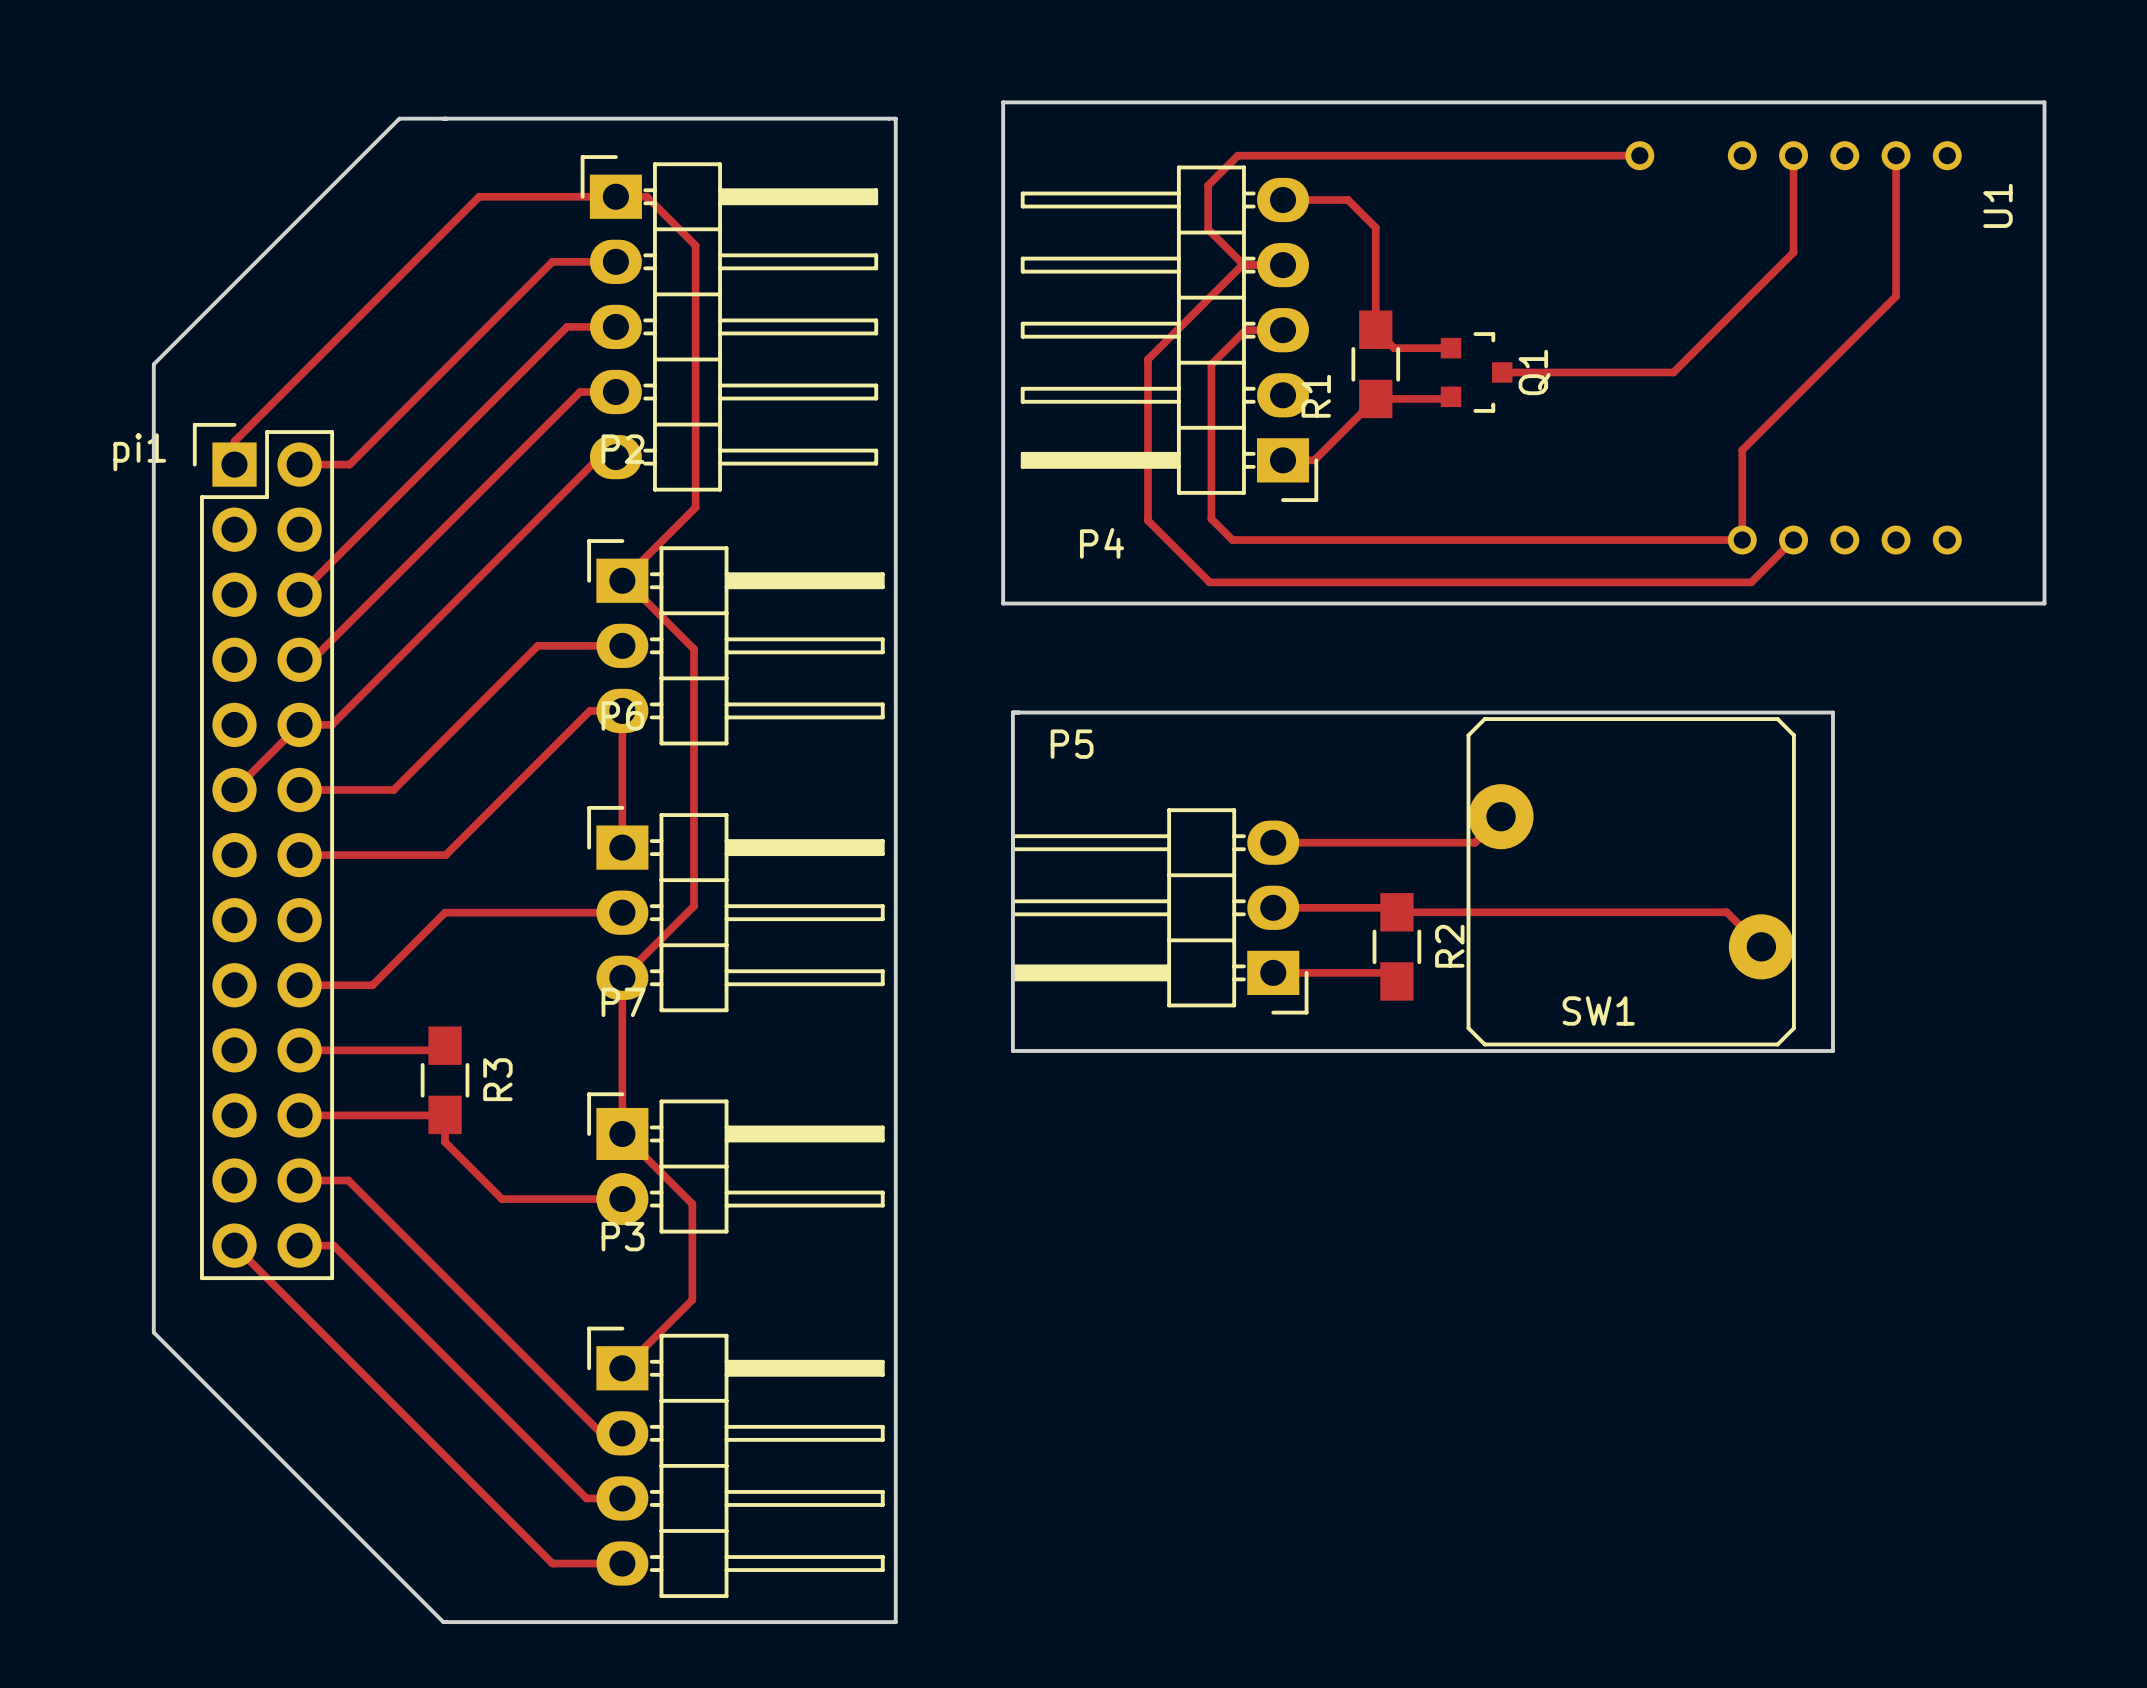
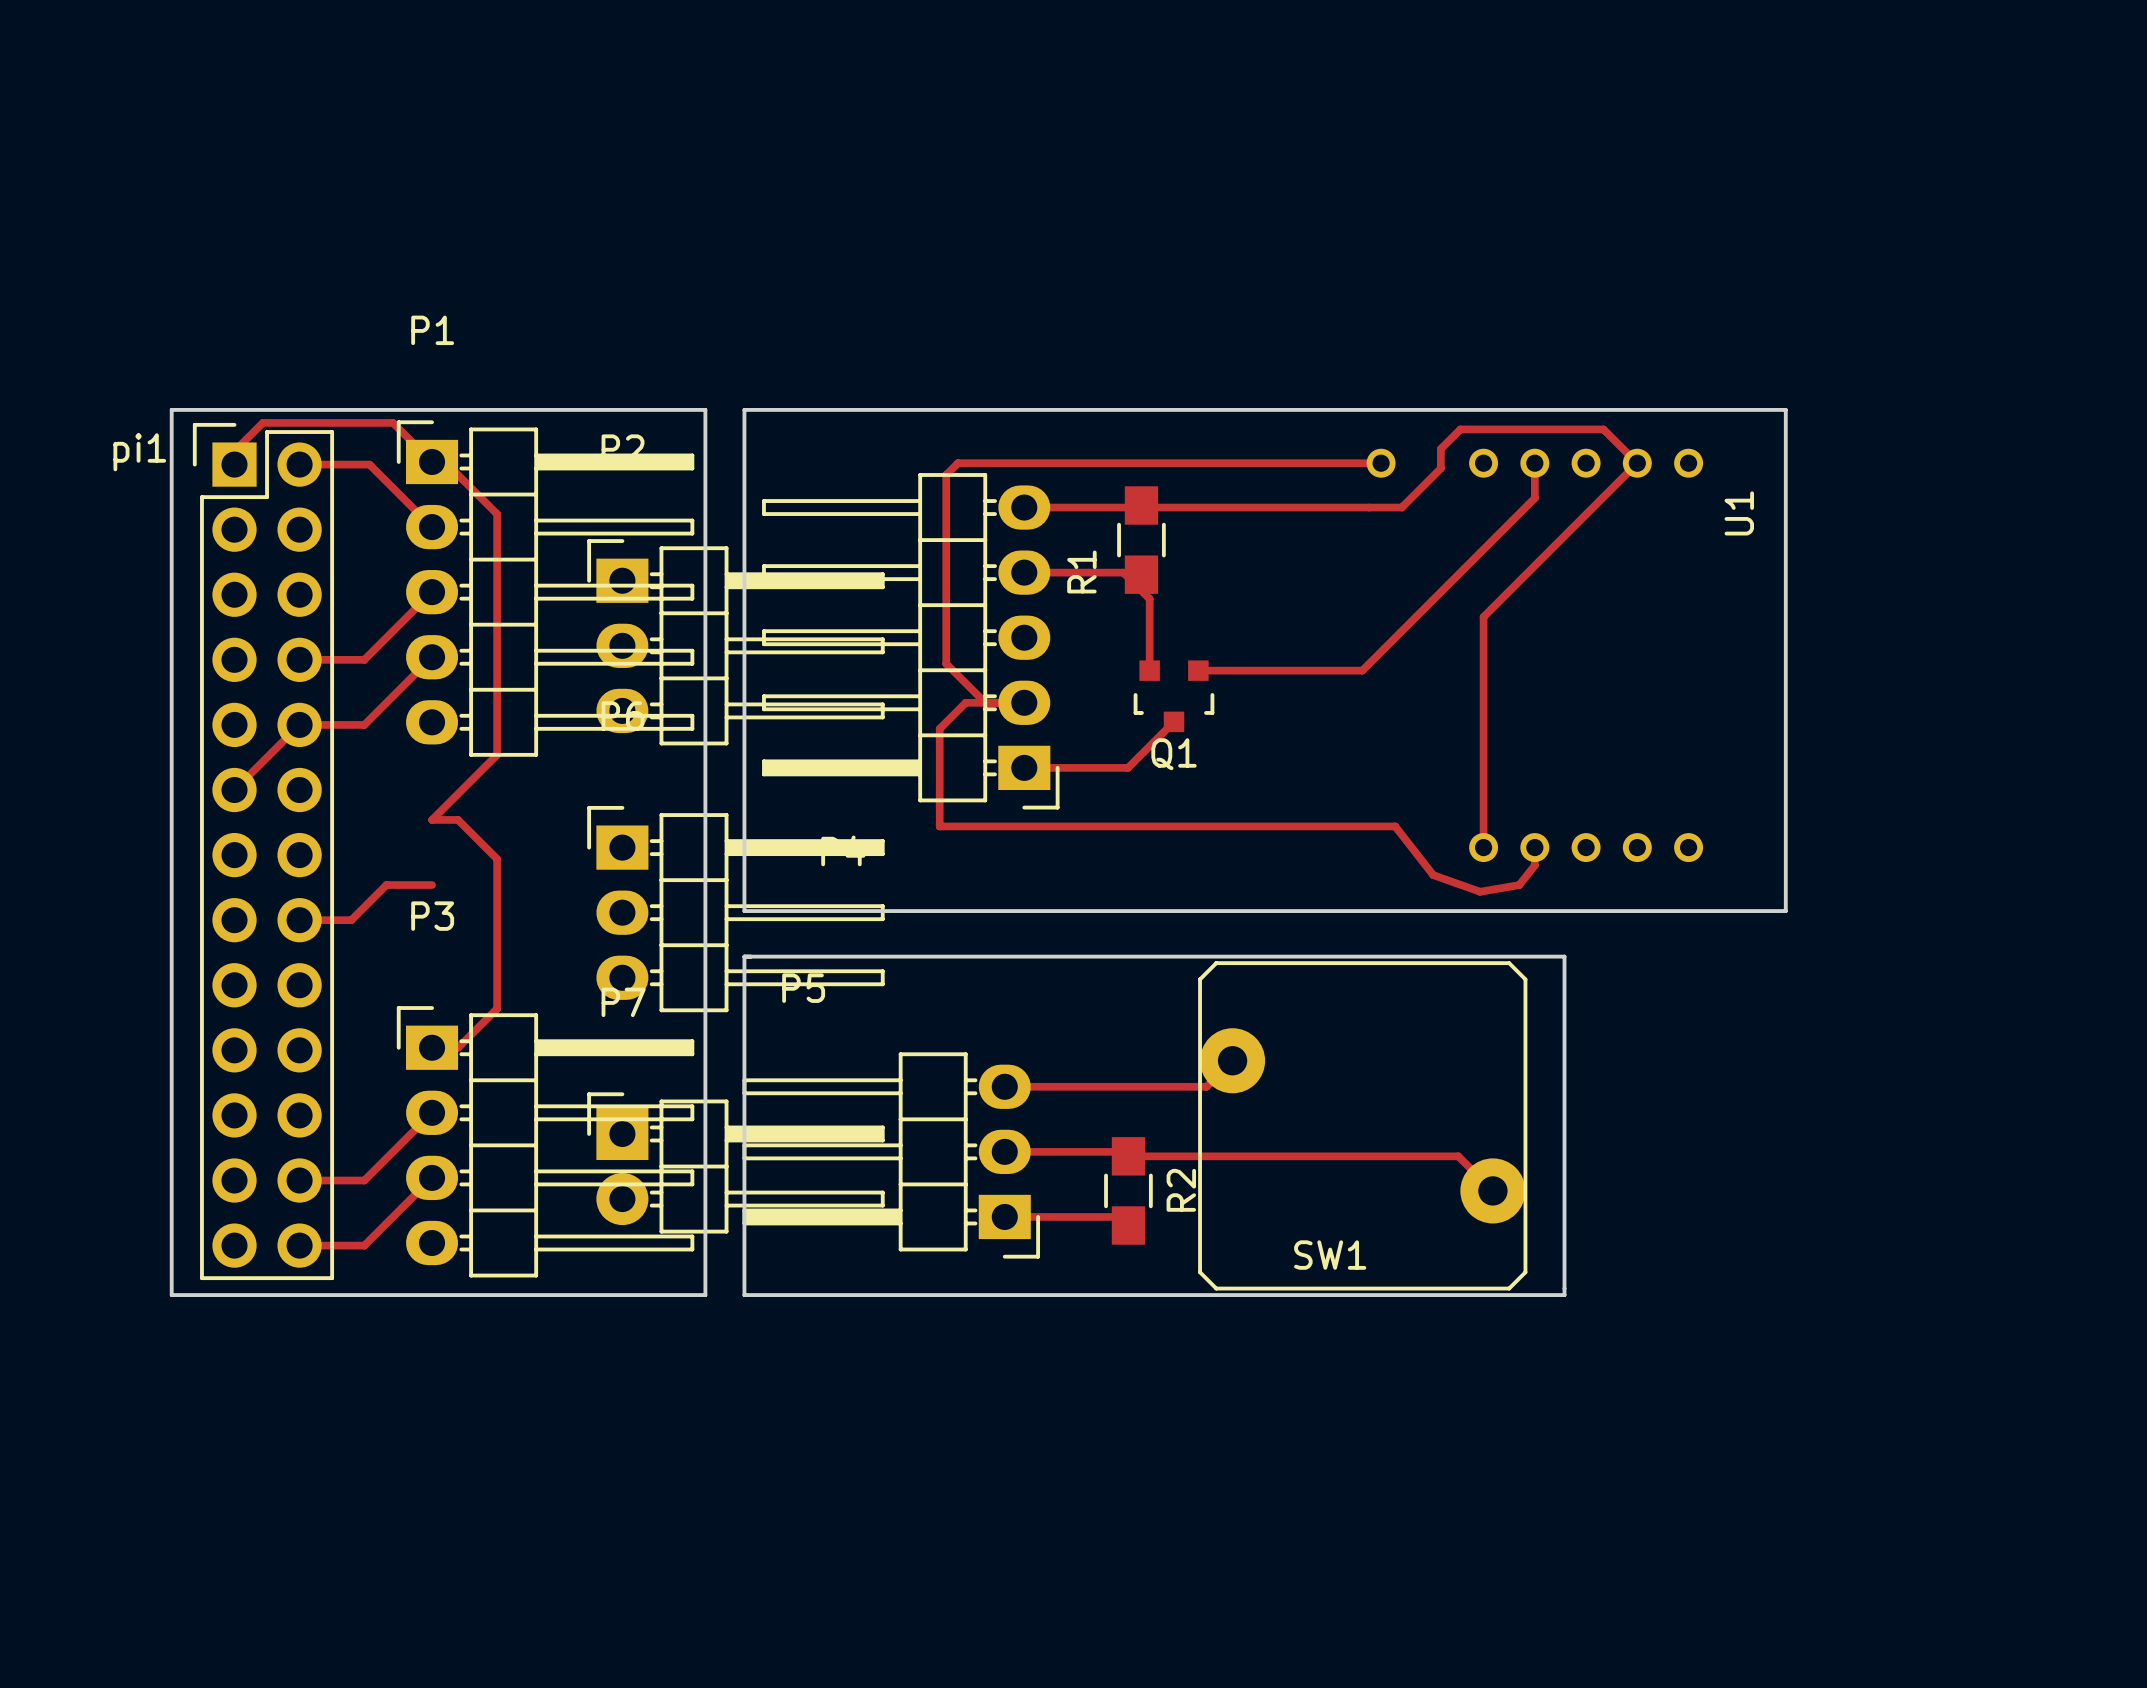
board edge: (1003, 102) (1003, 603) (2044, 603) (2044, 102) (1003, 102) -> (744, 409) (744, 911) (1785, 911) (1785, 409) (744, 409)
board edge: (399, 118) (895, 118) (895, 1622) (443, 1622) (153, 1332) (153, 364) (399, 118) -> none
top track: (1793, 155) (1793, 252) (1673, 372) (1502, 372) -> none
top track: (1896, 155) (1896, 296) (1742, 450) (1742, 540) (1232, 540) (1211, 518) (1211, 364) (1245, 330) (1283, 330) -> none
top track: (1639, 156) (1237, 155) (1208, 185) (1208, 229) (1243, 265) -> none
top track: (1283, 200) (1348, 200) (1375, 227) (1375, 329) (1394, 348) (1451, 348) -> none
top track: (615, 261) (552, 261) (349, 464) -> (432, 527) (369, 464) (349, 464)
top track: (1283, 265) (1242, 265) (1147, 359) (1147, 520) (1209, 582) (1751, 582) (1793, 540) -> none
part: (729, 323) -> none
top track: (615, 326) (567, 326) (299, 594) -> none
P4 position: (1169, 333) -> (910, 641)
U1 position: (1793, 347) -> (1534, 655)
R1 position: (1375, 364) -> (1141, 540)
Q1 rotation: 0° (1476, 372) -> 90° clockwise (1174, 696)
Q1 position: (1476, 372) -> (1174, 696)
top track: (615, 392) (580, 392) (312, 659) -> (432, 592) (364, 659) (312, 659)
top track: (1451, 396) (1448, 398) (1375, 398) (1314, 460) (1283, 460) -> none
board edge: none -> (171, 409) (705, 409) (705, 1295) (171, 1295) (171, 409)
top track: (234, 451) (234, 441) (479, 196) (646, 196) (695, 245) (695, 507) (622, 580) (625, 580) (694, 649) (694, 906) (622, 977) (622, 1133) (692, 1203) (692, 1299) (622, 1368) -> (234, 451) (262, 422) (392, 422) (432, 461) (445, 461) (497, 514) (497, 754) (432, 819) (458, 819) (497, 858) (497, 1008) (458, 1047) (432, 1047)
top track: (615, 457) (599, 457) (331, 724) -> (432, 657) (364, 724) (331, 724)
top track: none -> (1381, 463) (957, 463) (946, 474) (946, 663) (985, 702)
top track: none -> (1534, 463) (1534, 498) (1362, 670) (1198, 670)
top track: none -> (1004, 507) (1401, 507) (1440, 468) (1440, 448) (1460, 429) (1603, 429) (1637, 463) (1483, 616) (1483, 847)
top track: none -> (1004, 572) (1123, 572) (1149, 599) (1149, 670)
P1: none -> (545, 588)
top track: (622, 645) (537, 645) (393, 790) (299, 790) -> none
top track: none -> (1004, 702) (965, 702) (939, 728) (939, 826) (1395, 826) (1433, 875) (1480, 891) (1519, 885) (1534, 865) (1534, 847)
board edge: (1012, 712) (1832, 712) (1832, 1050) (1012, 1050) (1012, 712) -> (744, 956) (1564, 956) (1564, 1295) (744, 1295) (744, 956)
top track: none -> (1174, 721) (1127, 767) (1004, 767)
top track: (1501, 816) (1475, 842) (1273, 842) -> (1232, 1060) (1206, 1086) (1004, 1086)
top track: (638, 847) (622, 847) (622, 710) (589, 710) (445, 855) (299, 855) -> none
SW1 position: (1631, 881) -> (1362, 1125)
top track: none -> (432, 885) (386, 885) (351, 920) (299, 920)
top track: (1273, 907) (1392, 907) (1396, 912) (1726, 912) (1761, 946) -> (1004, 1151) (1123, 1151) (1128, 1156) (1458, 1156) (1492, 1190)
P5 position: (1159, 911) -> (891, 1155)
top track: (622, 912) (445, 912) (372, 985) (299, 985) -> none
R2 position: (1396, 946) -> (1128, 1190)
top track: (1273, 972) (1388, 972) (1396, 981) -> (1004, 1216) (1119, 1216) (1128, 1225)
top track: (445, 1045) (440, 1050) (299, 1050) -> none
R3: (445, 1080) -> none
top track: (299, 1115) (445, 1114) (445, 1142) (502, 1199) (622, 1199) -> none
top track: (348, 1180) (601, 1433) (622, 1433) -> (348, 1180) (364, 1180) (432, 1112)
top track: (234, 1245) (552, 1563) (622, 1563) -> none
top track: (333, 1245) (586, 1498) (622, 1498) -> (333, 1245) (364, 1245) (432, 1177)
P3 position: (735, 1462) -> (545, 1141)

